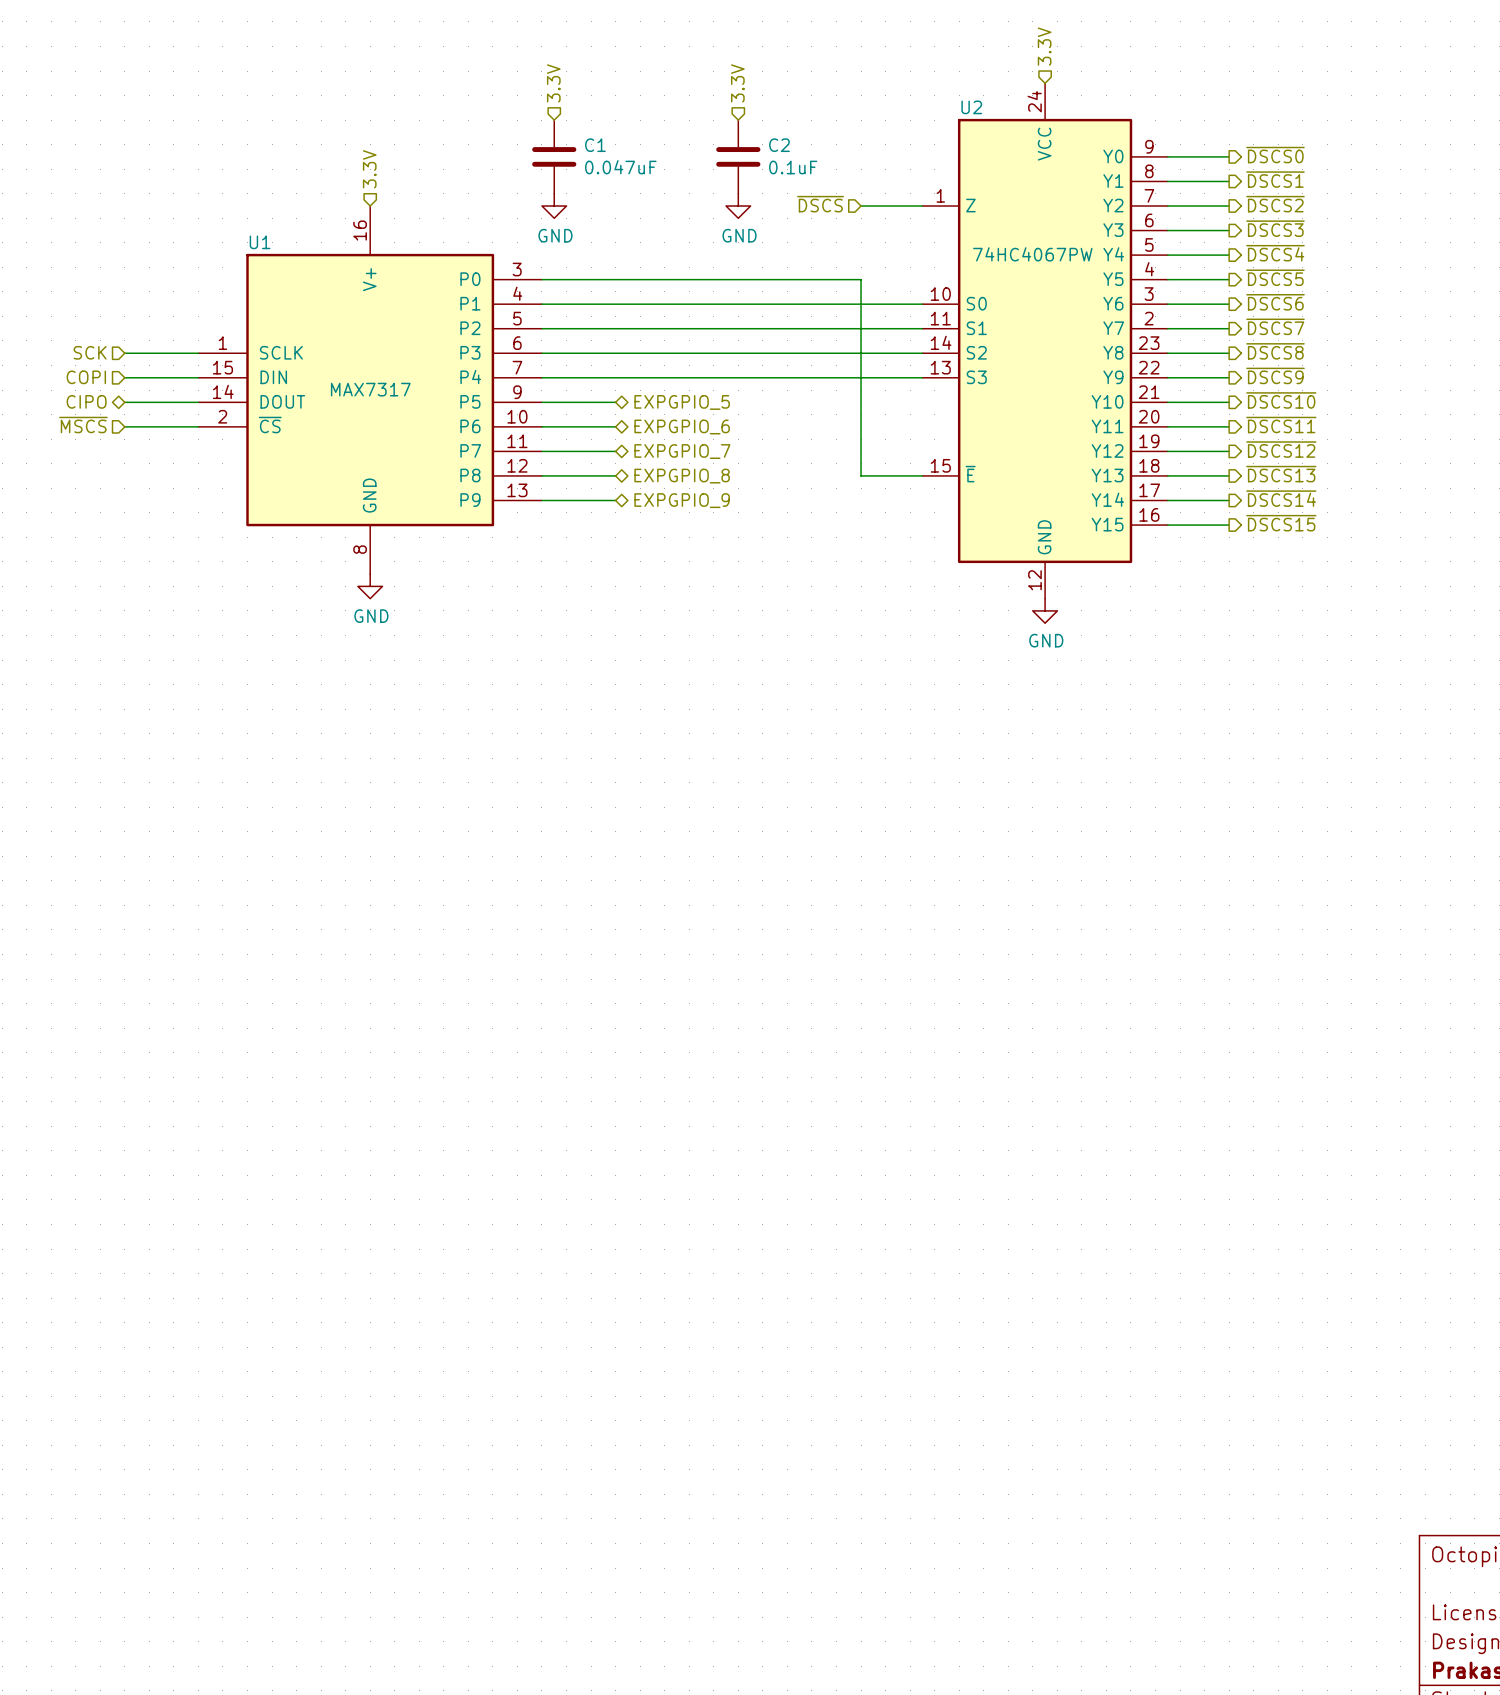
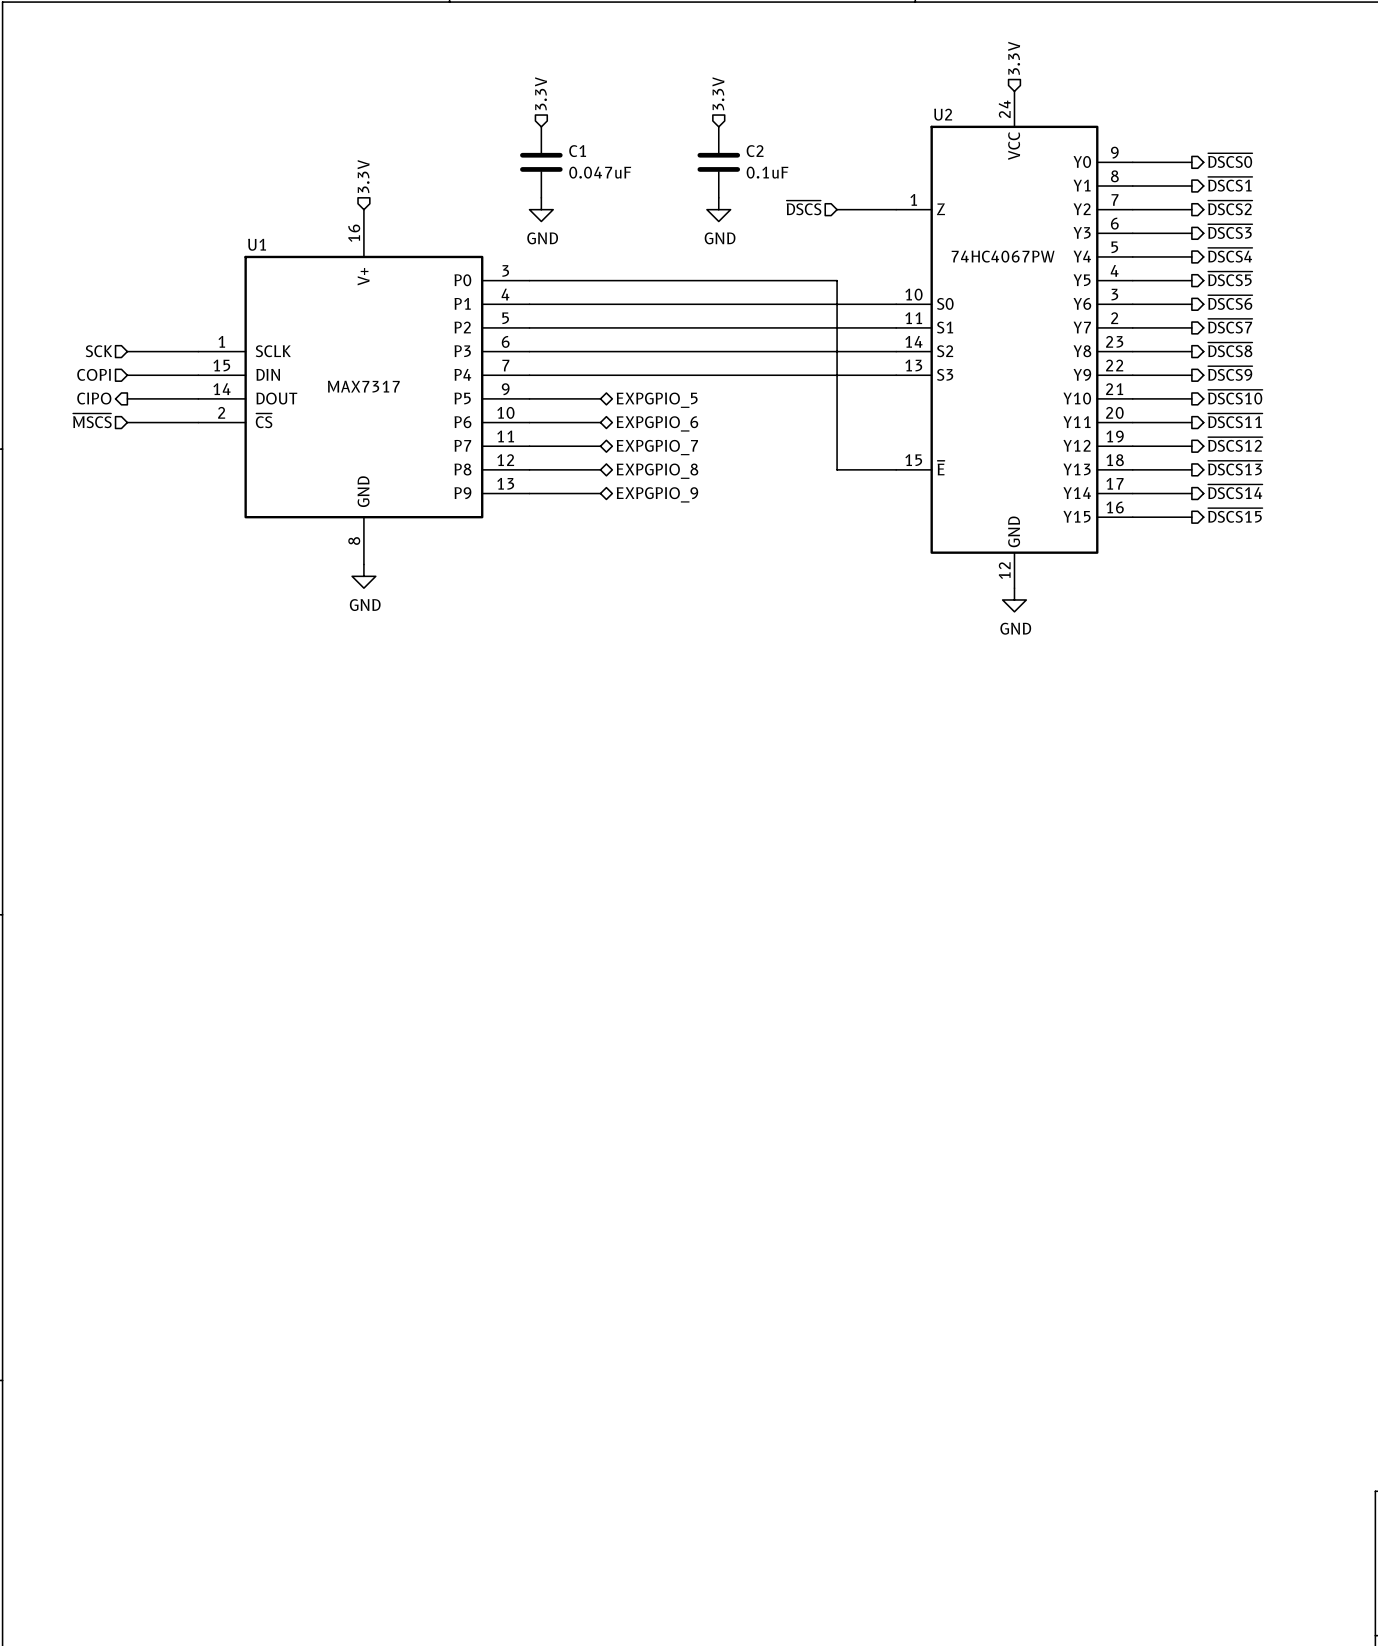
hierarchical label shape: bidirectional (86, 401) -> output (94, 398)

